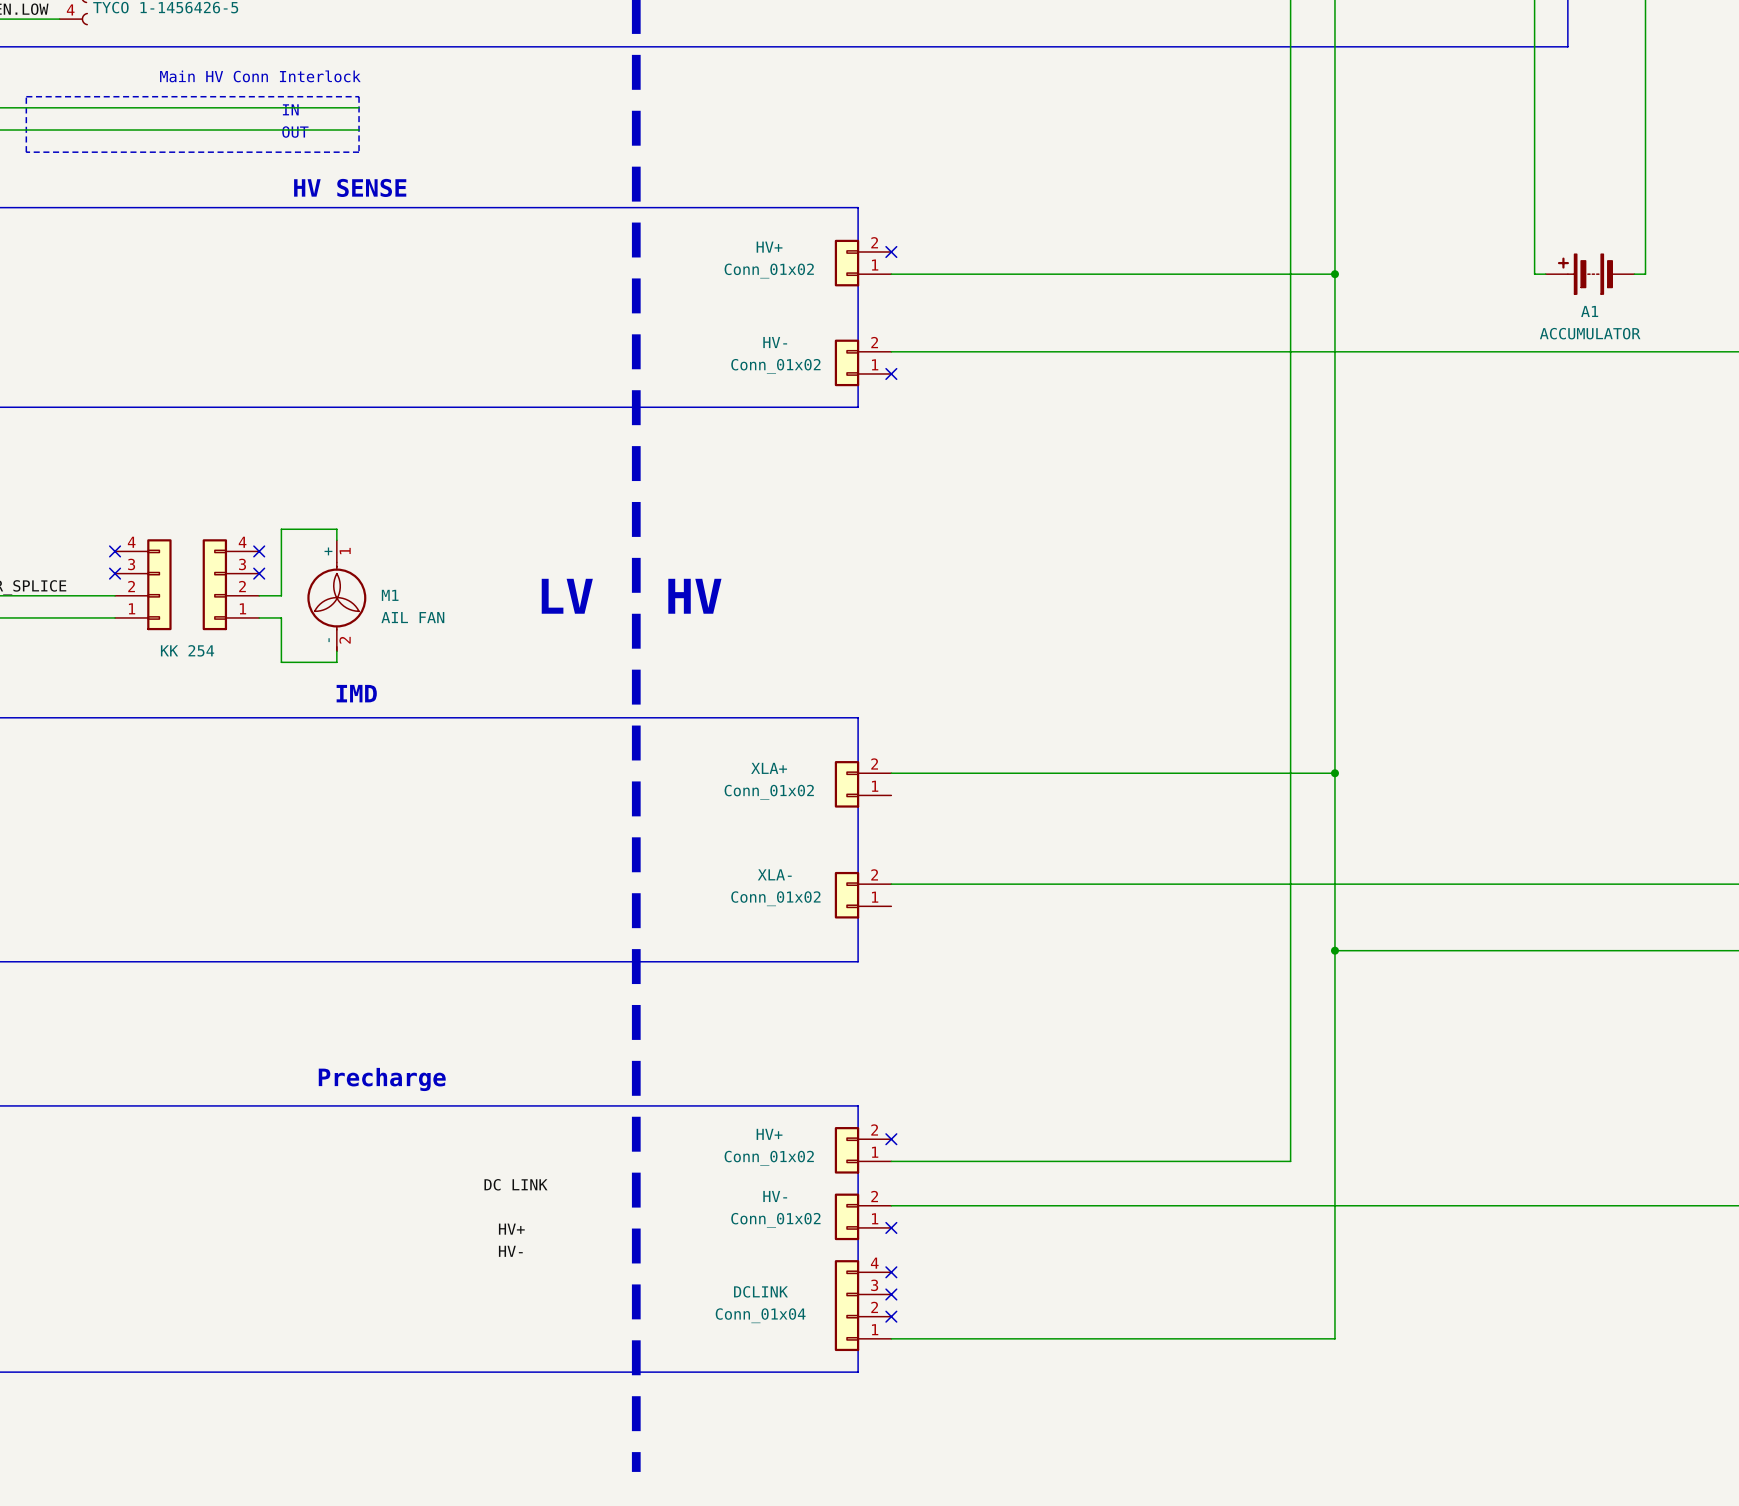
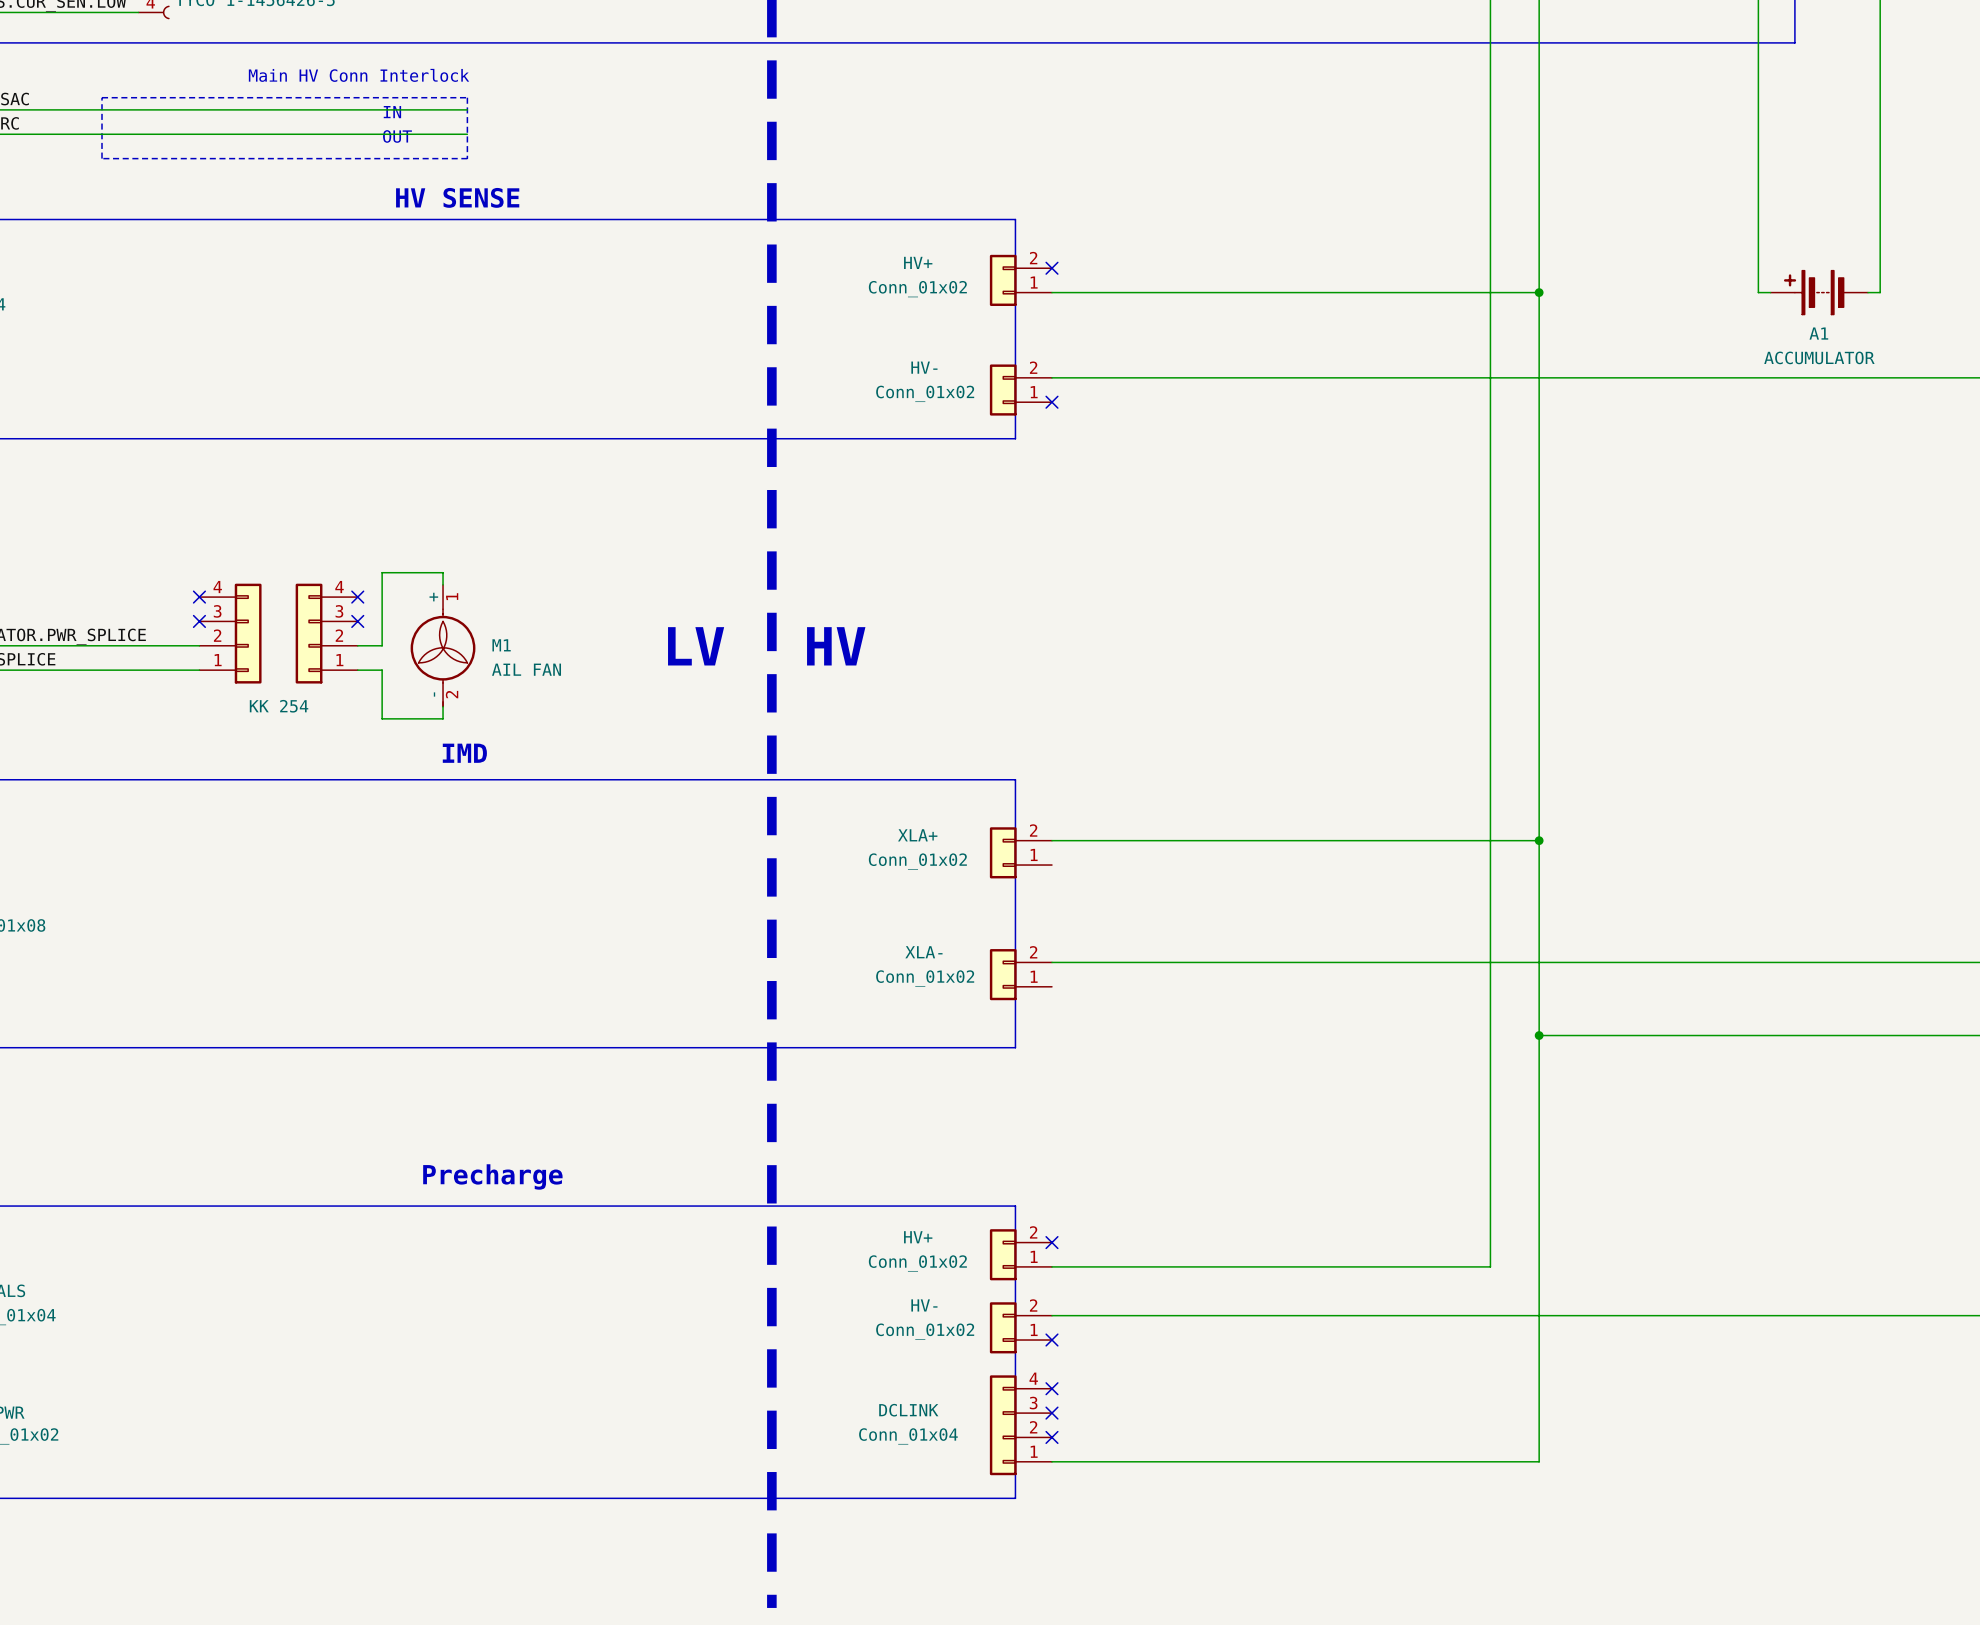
label: DC LINK (515, 1184) -> none
label: HV+ (511, 1229) -> none
label: HV- (510, 1251) -> none

